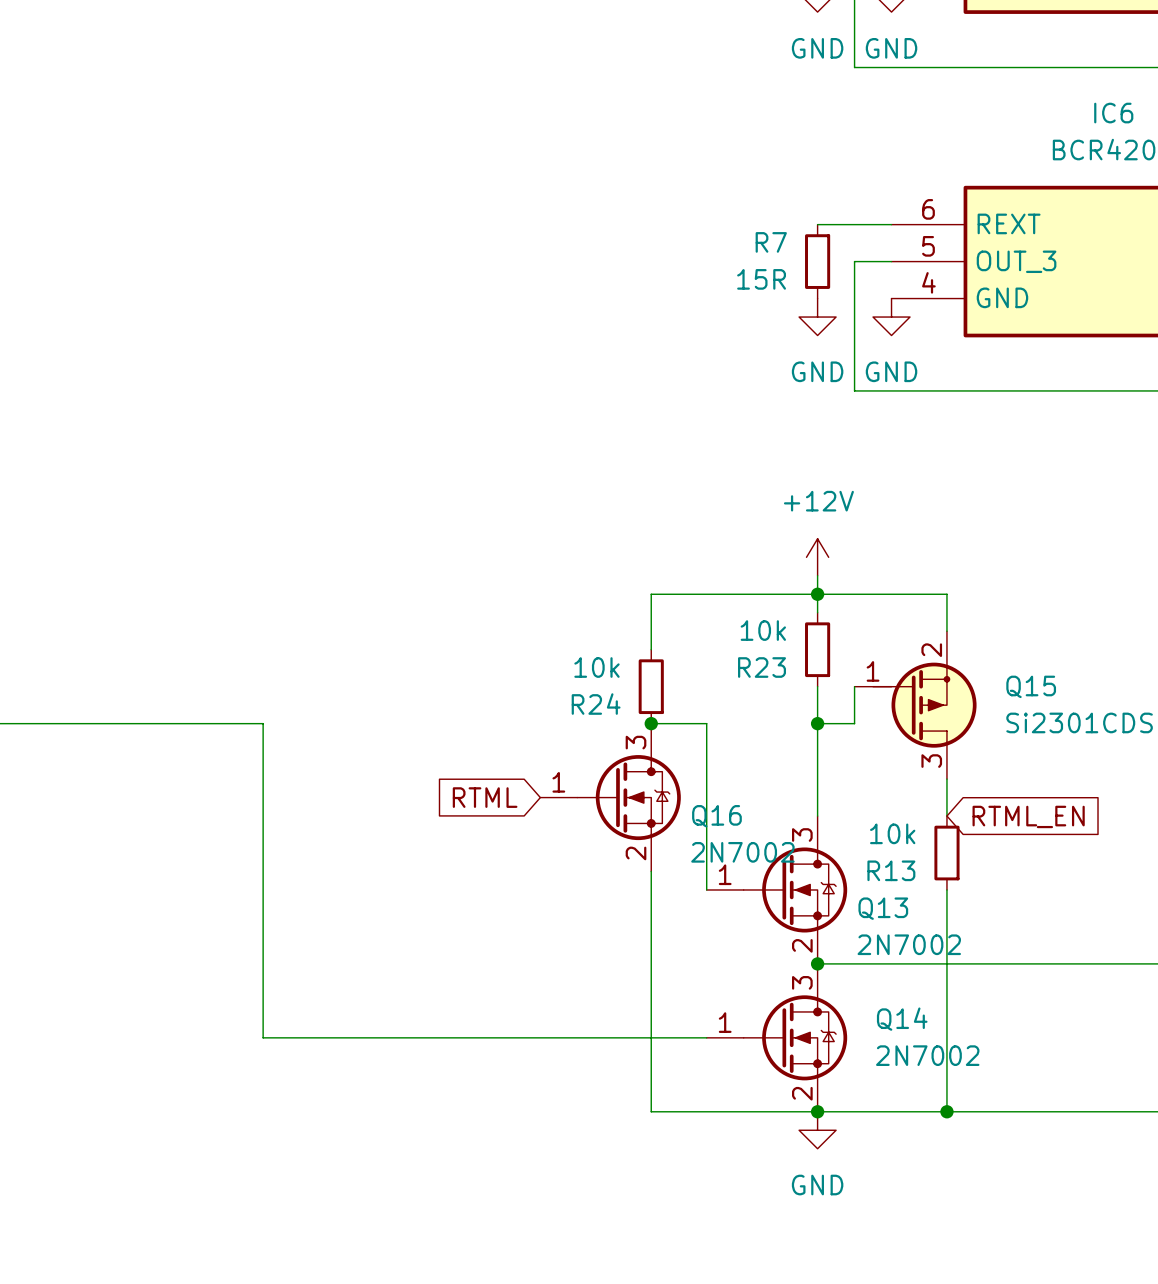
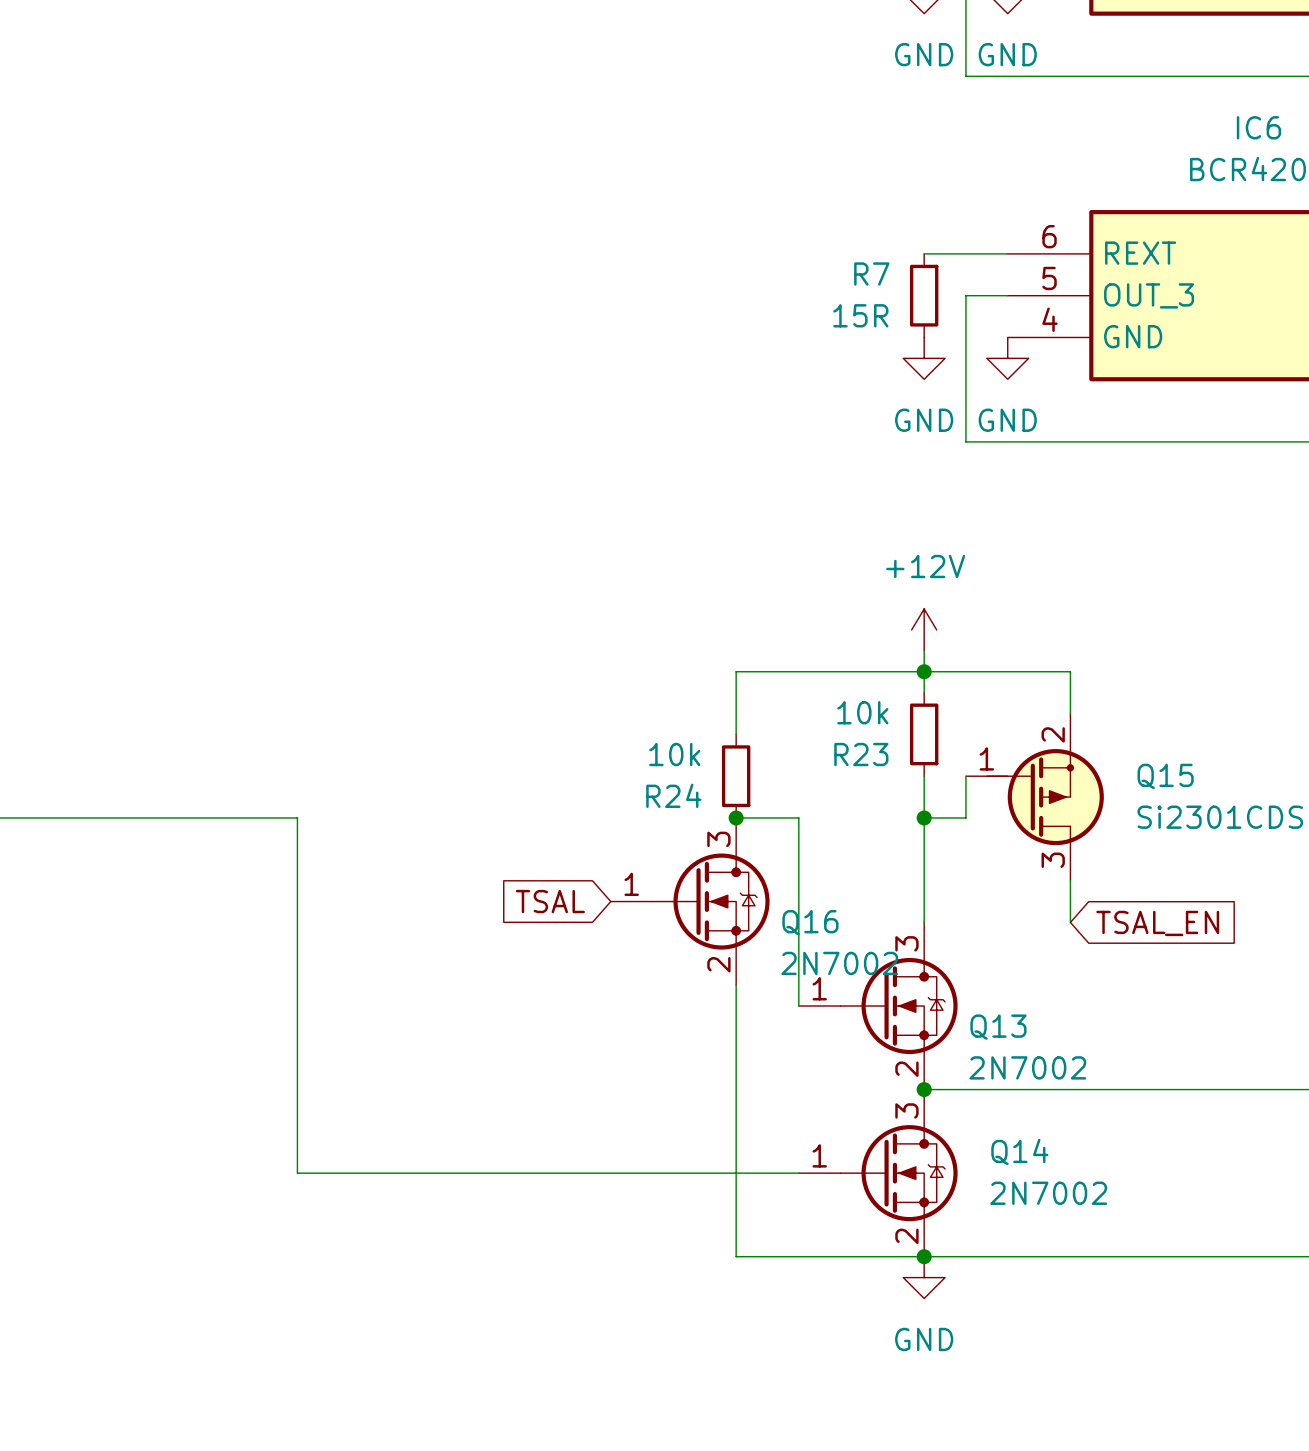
global label: RTML (485, 797) -> TSAL (550, 901)
global label: RTML_EN (1028, 816) -> TSAL_EN (1157, 923)
R13: 10k (946, 853) -> none
wire: (946, 889) (946, 1111) -> none
junction: (946, 1111) -> none

